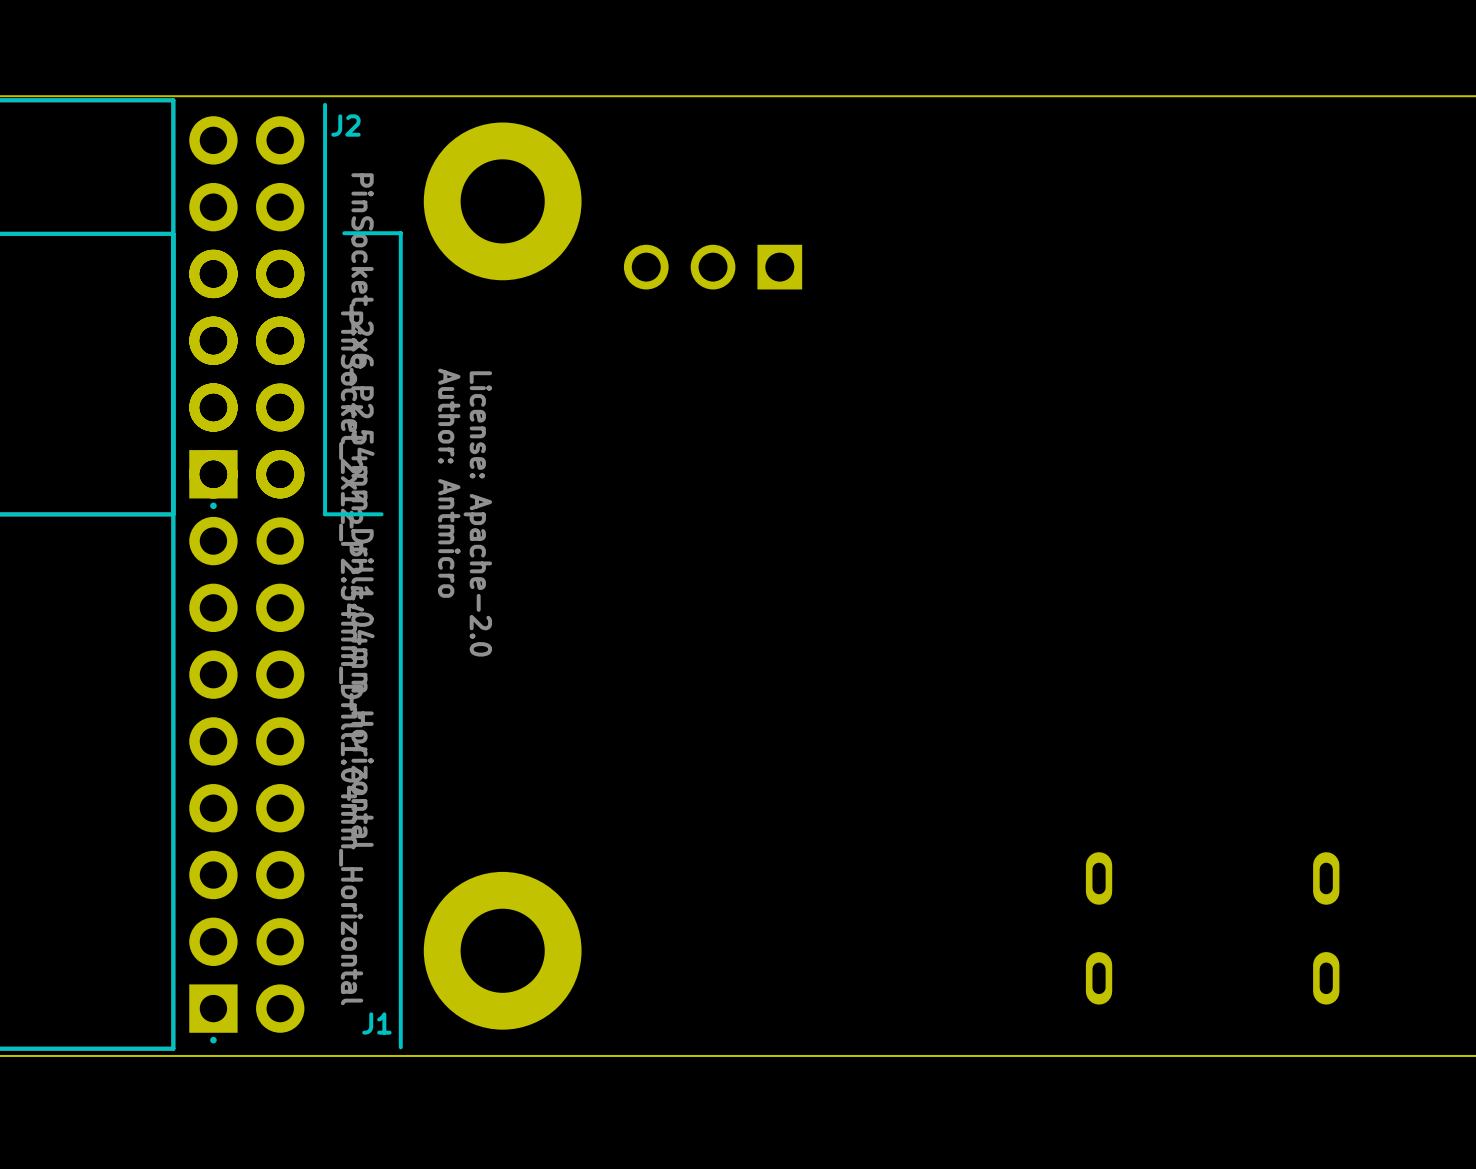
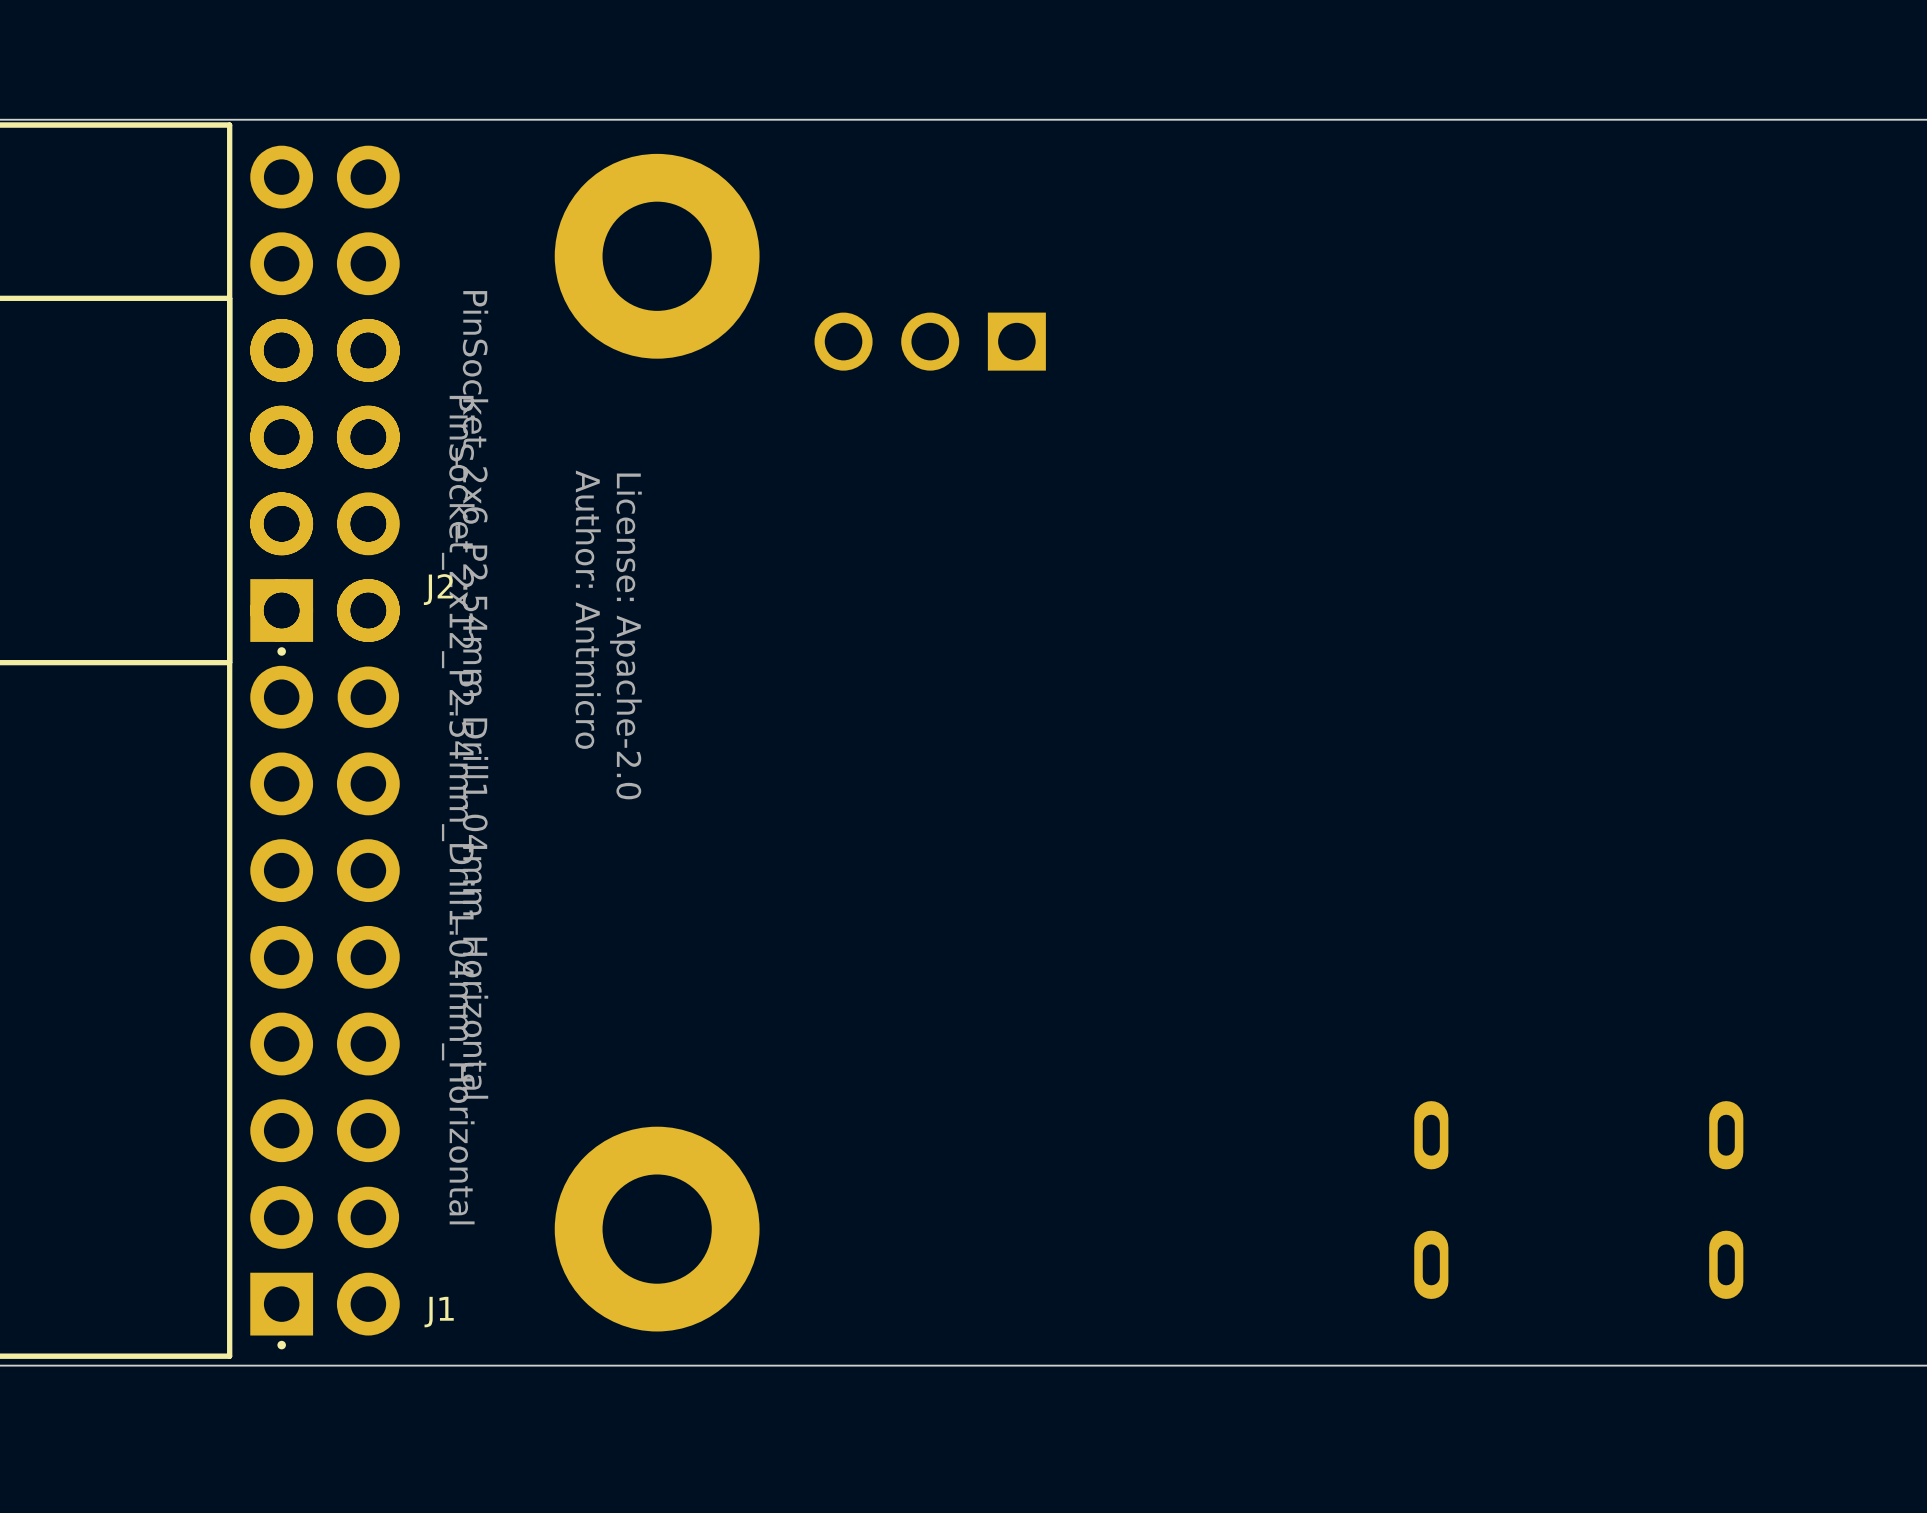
line: (325, 104) (325, 514) (381, 514) -> none
J2 name position: J2 (345, 125) -> J2 (438, 589)
line: (344, 233) (400, 233) (400, 1047) -> none
J1 name position: J1 (376, 1023) -> J1 (439, 1312)

